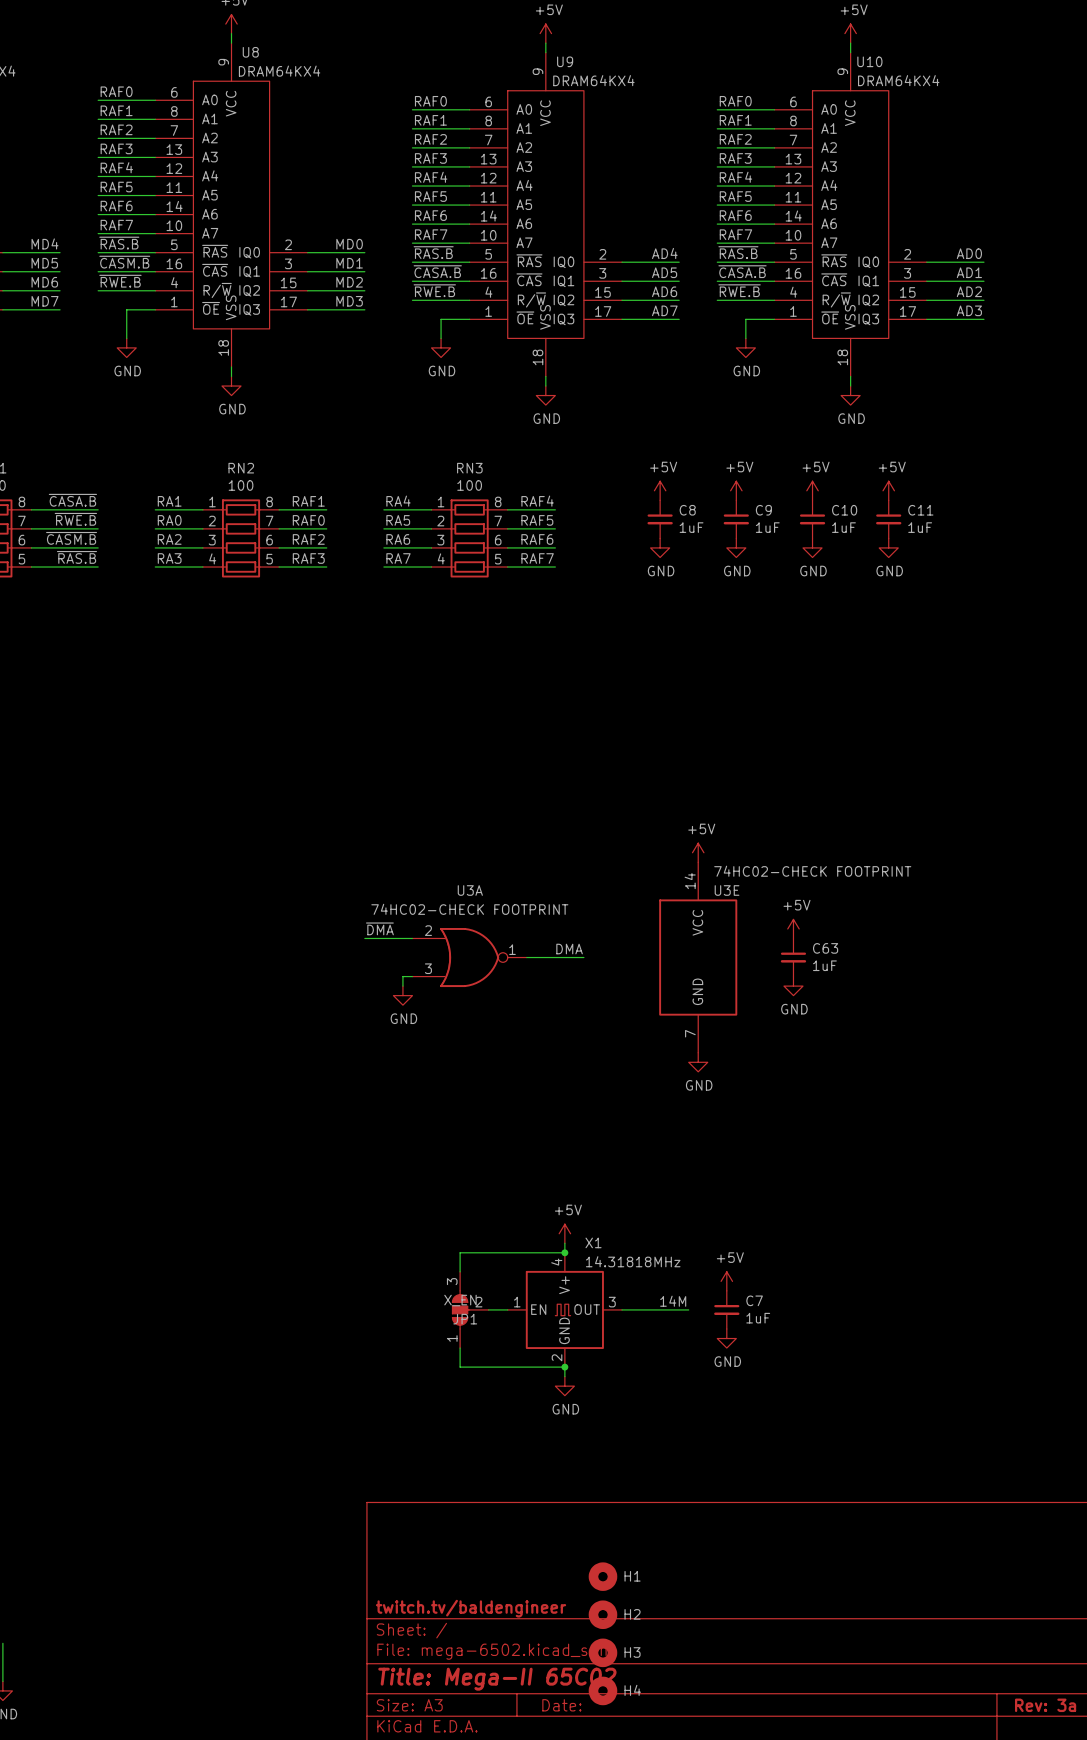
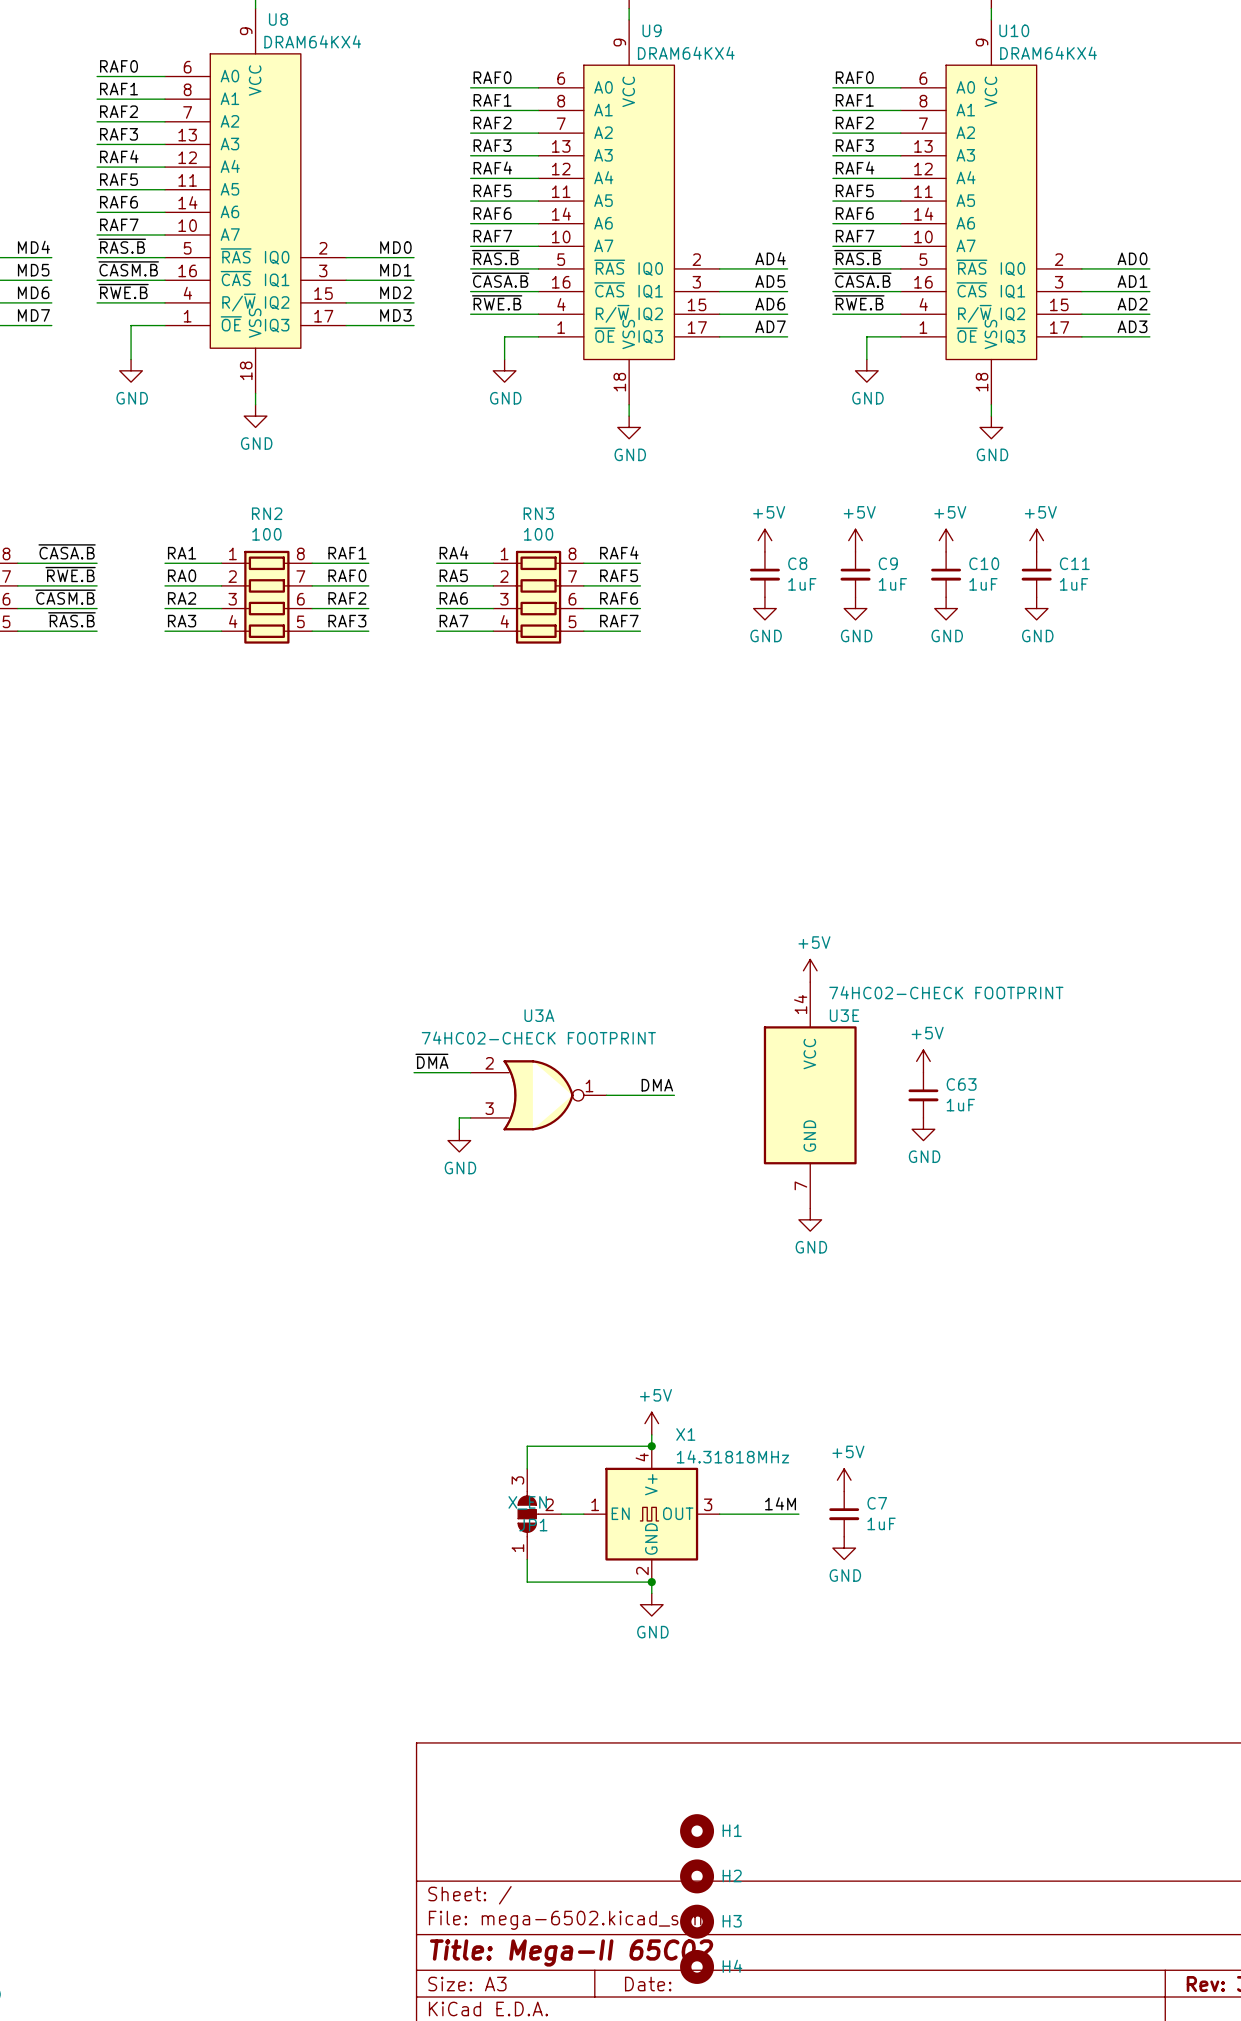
title block: twitch.tv/baldengineer (471, 1608) -> none

